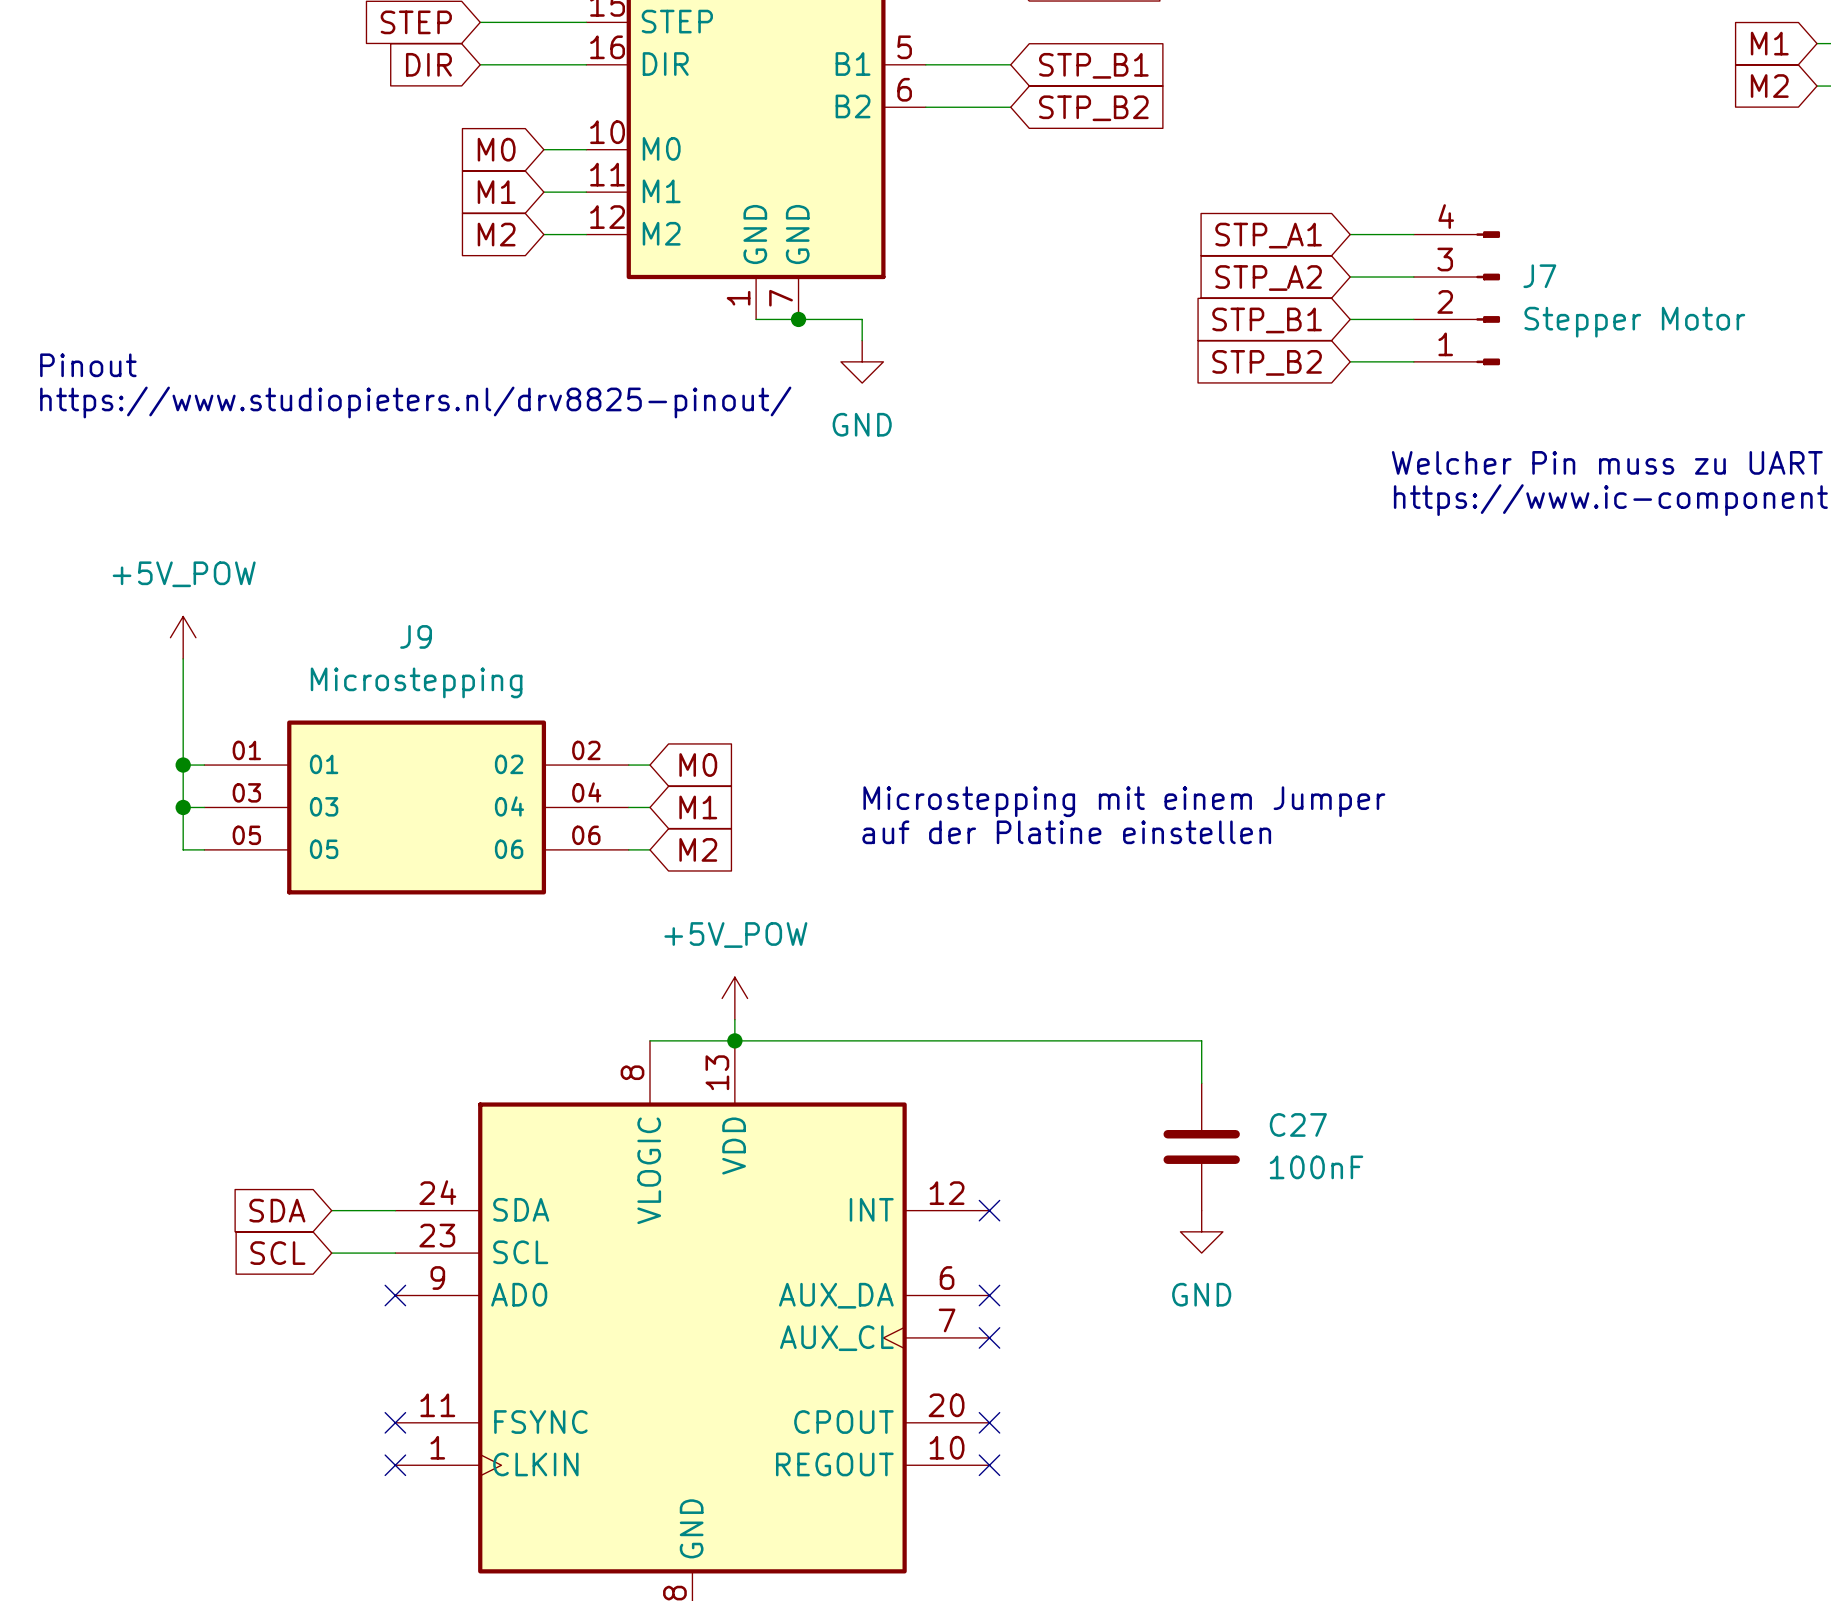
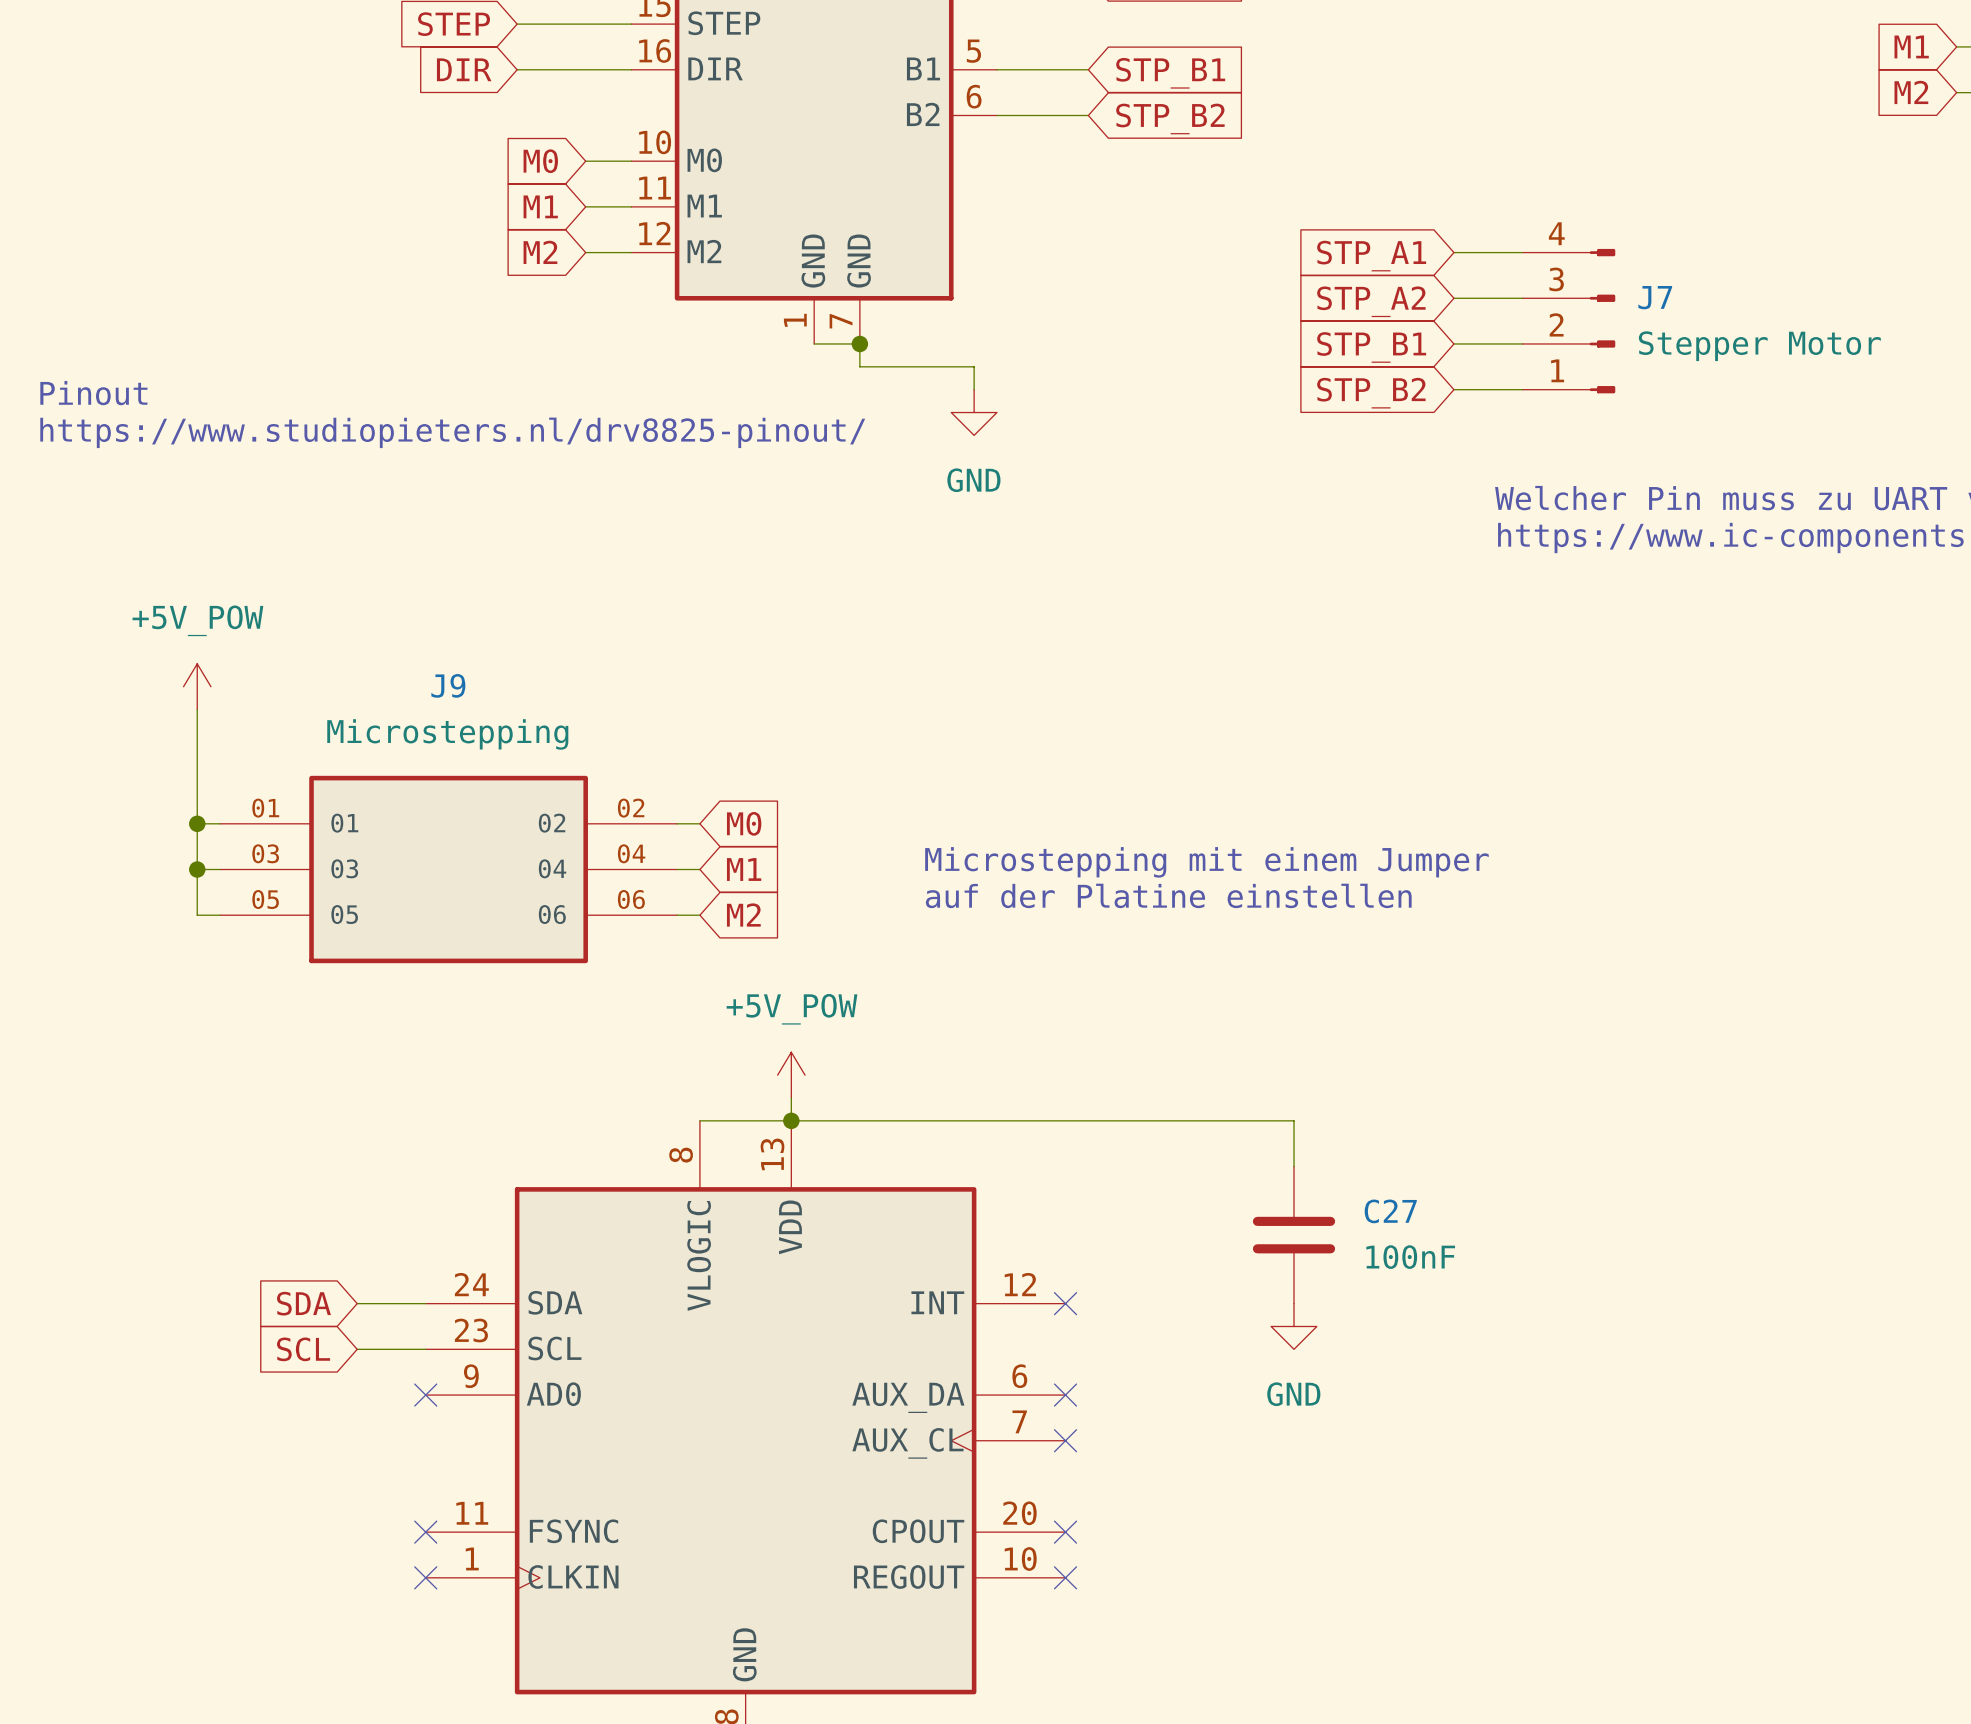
wire: (798, 319) (862, 319) (862, 340) -> (859, 343) (859, 366) (974, 366) (974, 389)
power symbol position: GND (862, 361) -> GND (974, 412)

